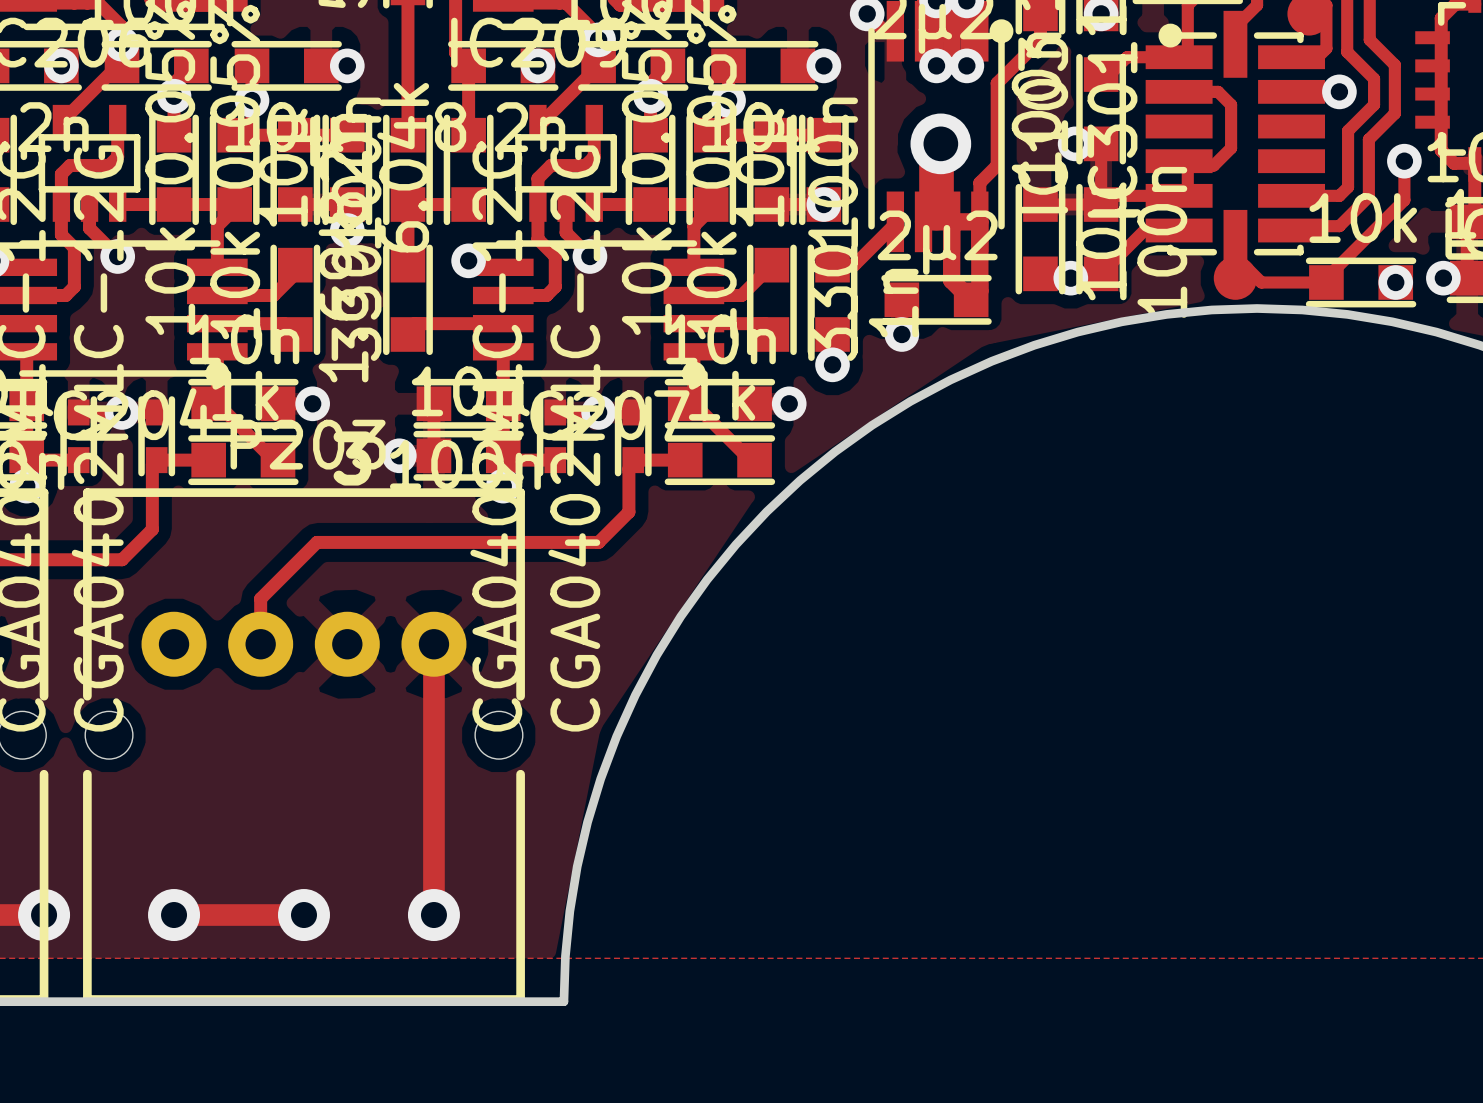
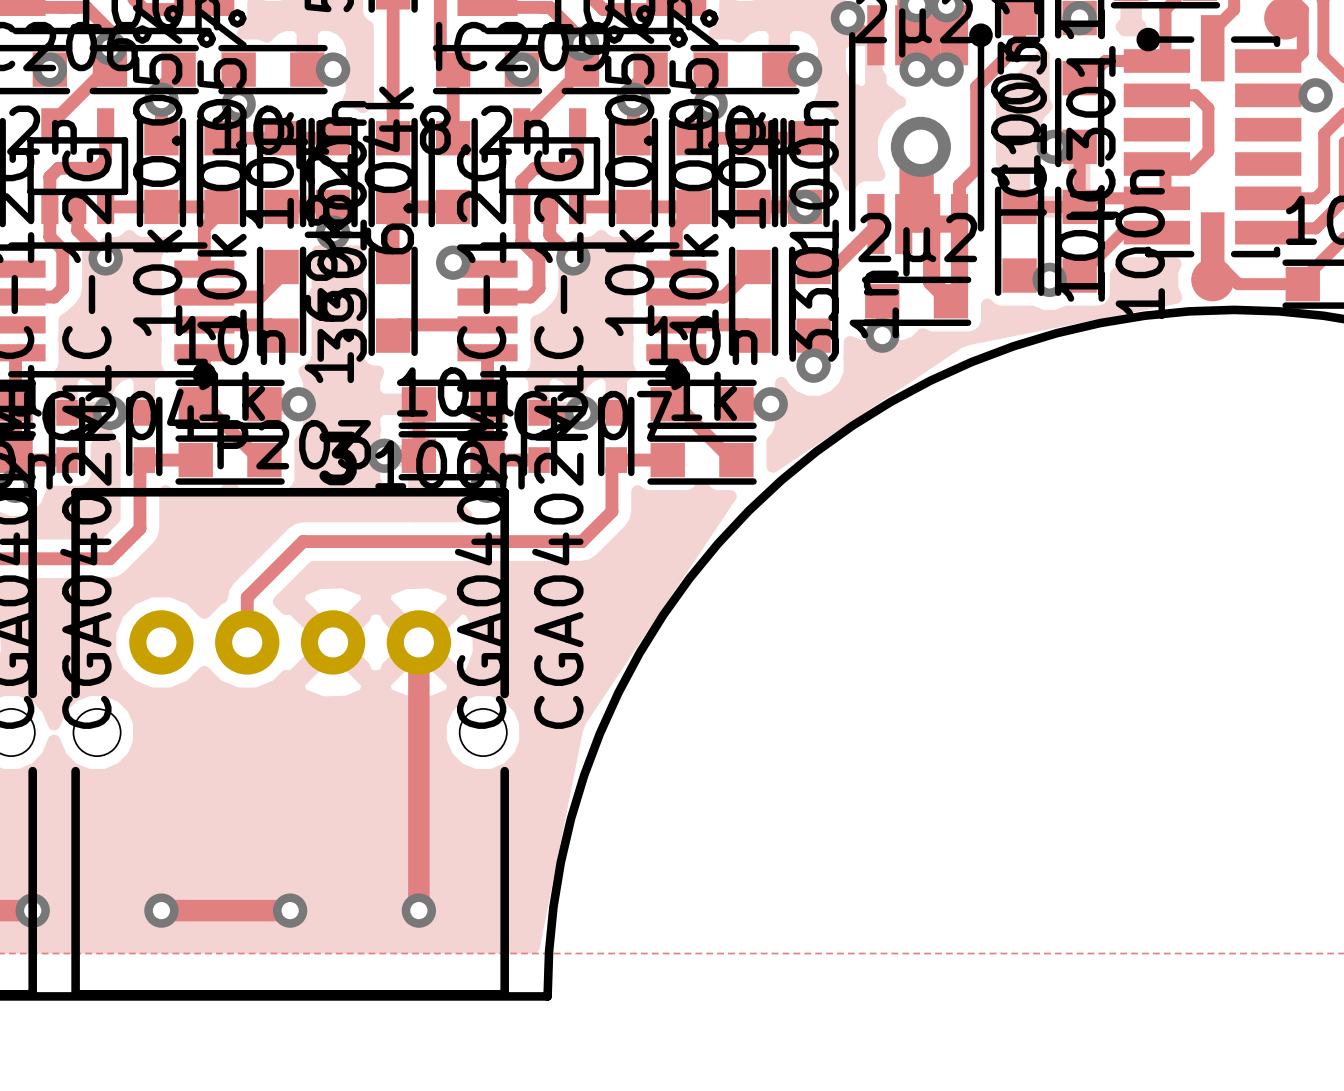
via size: [18, 889, 71, 942] -> [15, 893, 50, 928]
via size: [148, 889, 201, 942] -> [144, 893, 179, 928]
via size: [278, 889, 330, 942] -> [272, 893, 308, 928]
via size: [407, 889, 460, 942] -> [401, 893, 437, 928]

